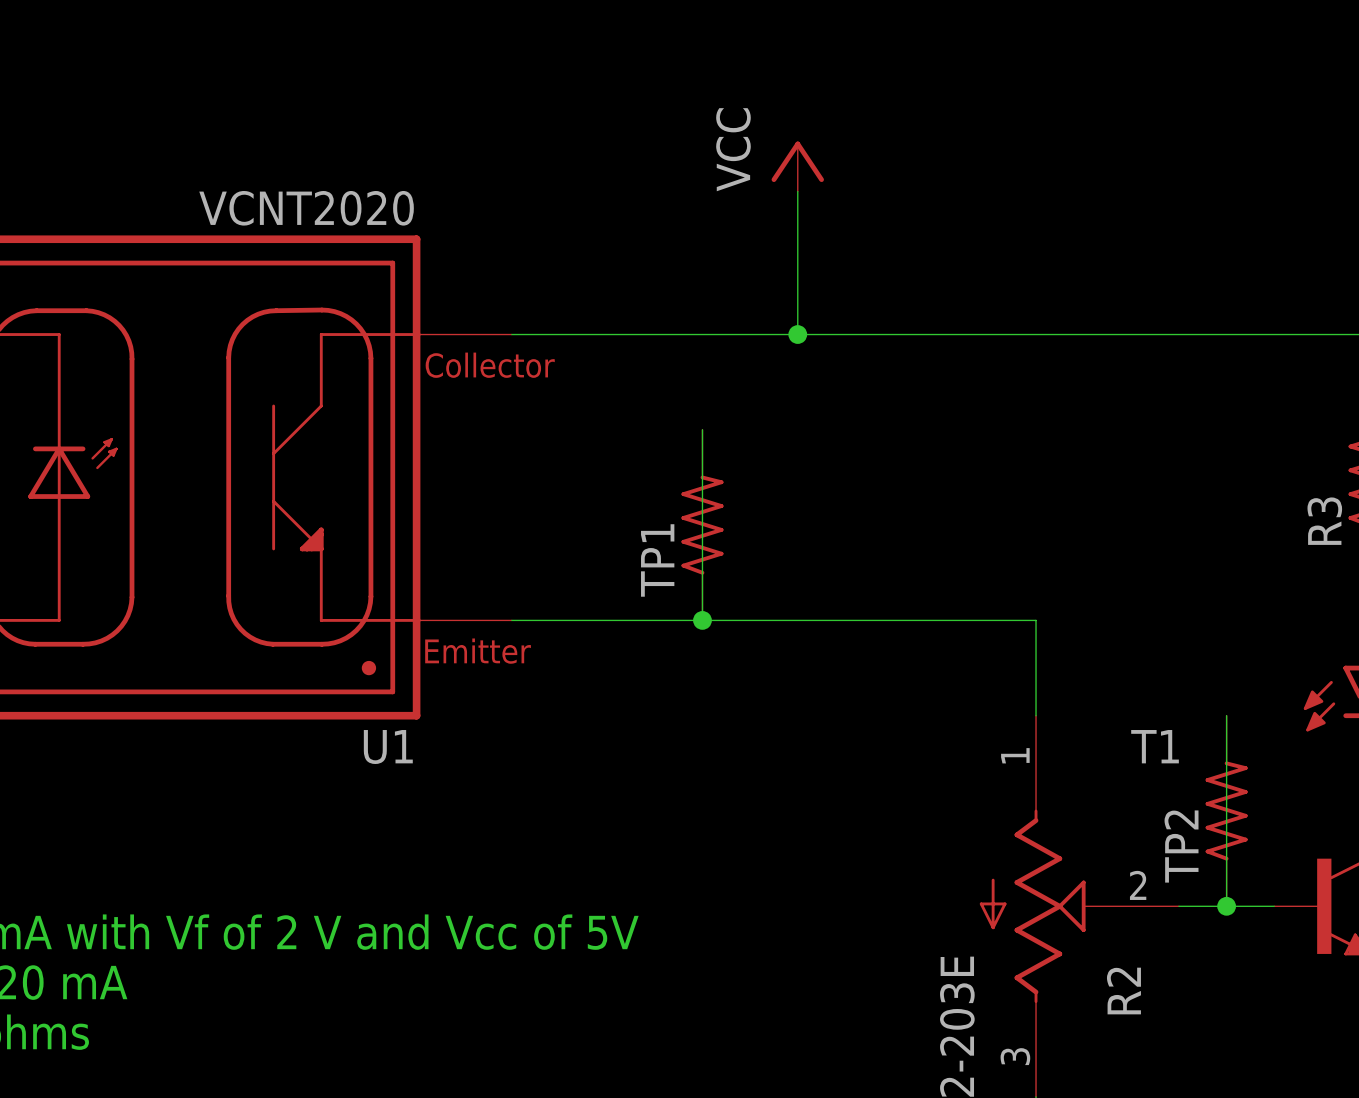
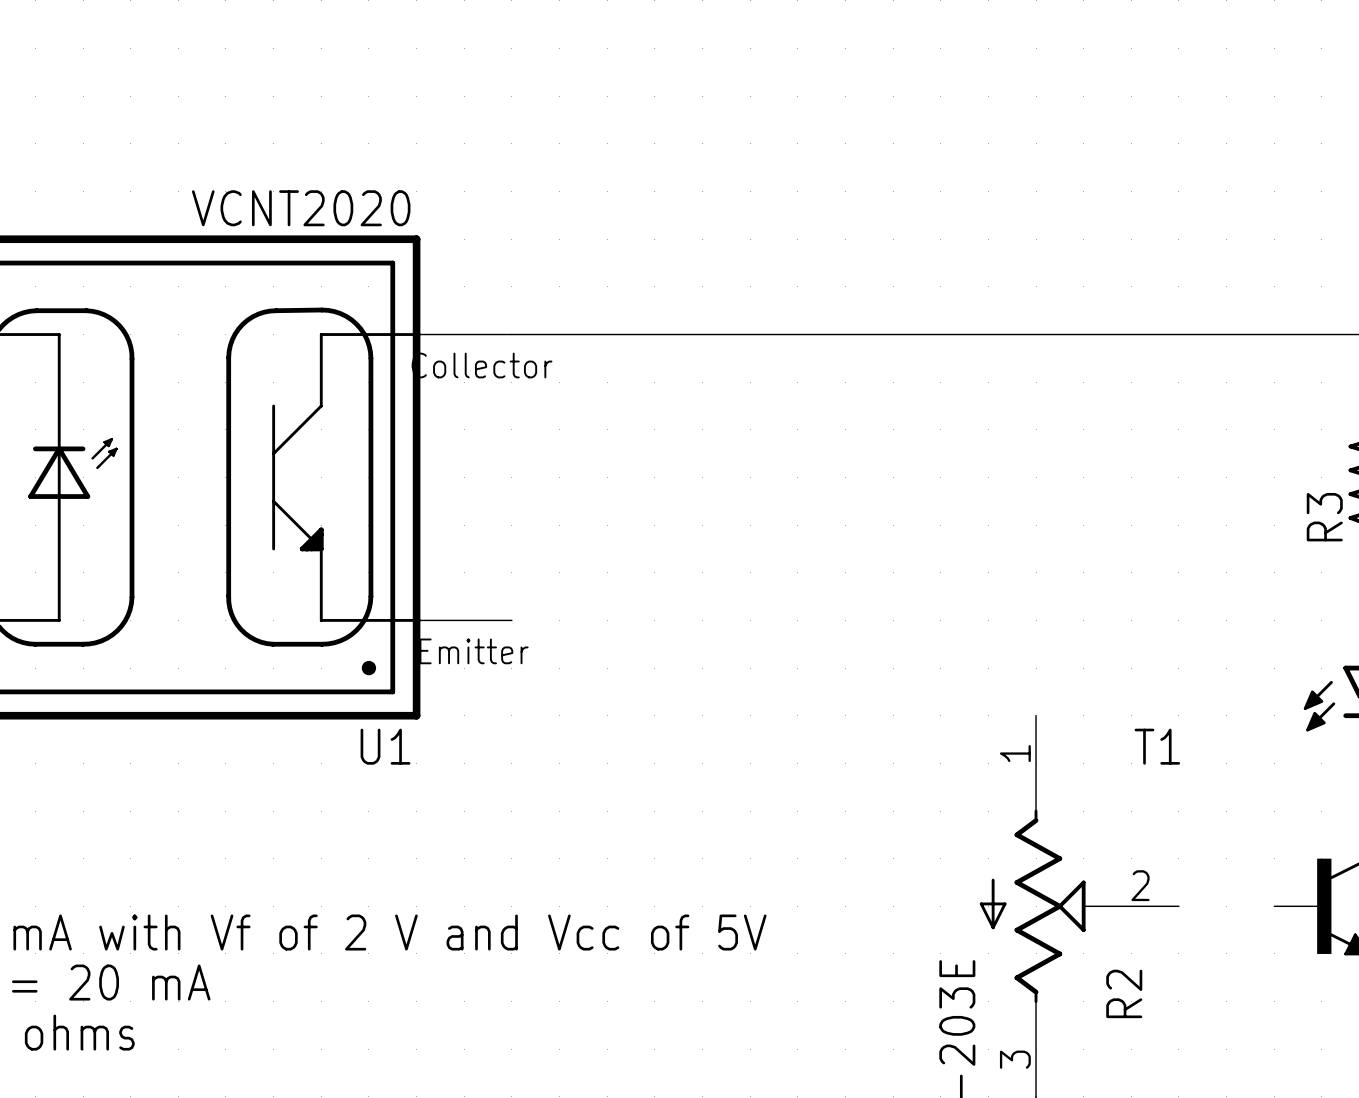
power symbol: VCC (797, 166) -> none
wire: (797, 191) (797, 334) -> none
junction: (797, 334) -> none
wire: (702, 429) (702, 620) -> none
TP1: (702, 525) -> none
wire: (511, 620) (1036, 620) (1036, 715) -> none
junction: (702, 620) -> none
wire: (1226, 715) (1226, 906) -> none
TP2: (1226, 811) -> none
wire: (1178, 906) (1274, 906) -> none
junction: (1226, 906) -> none

